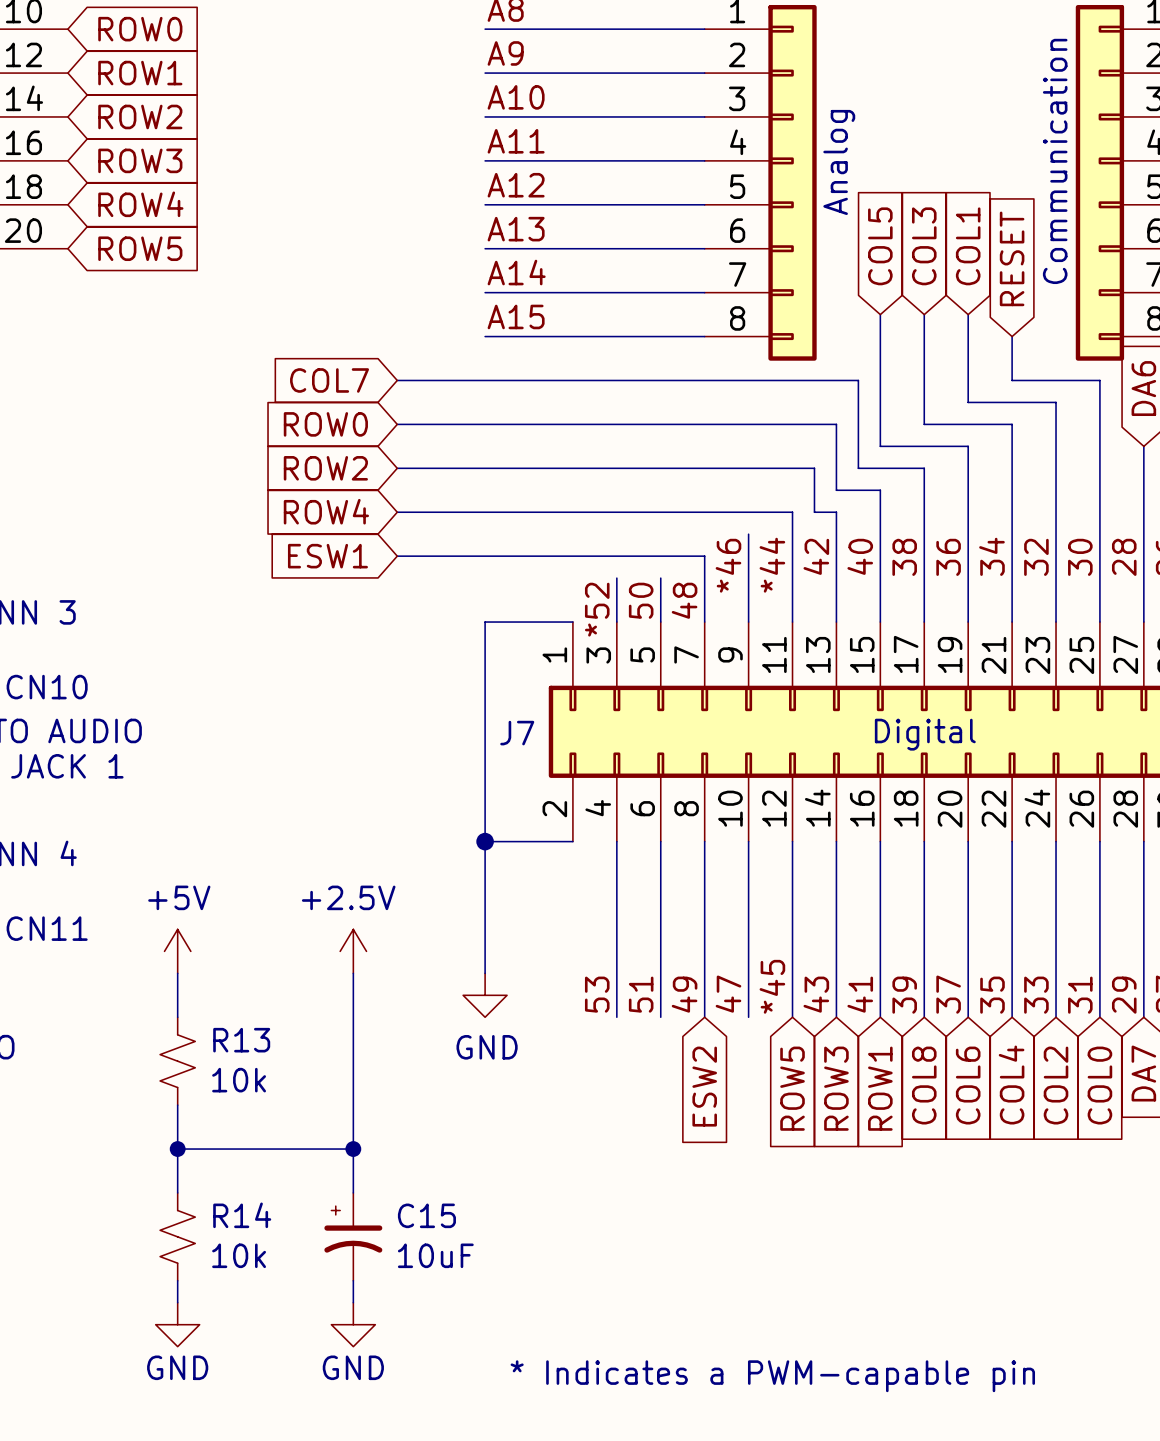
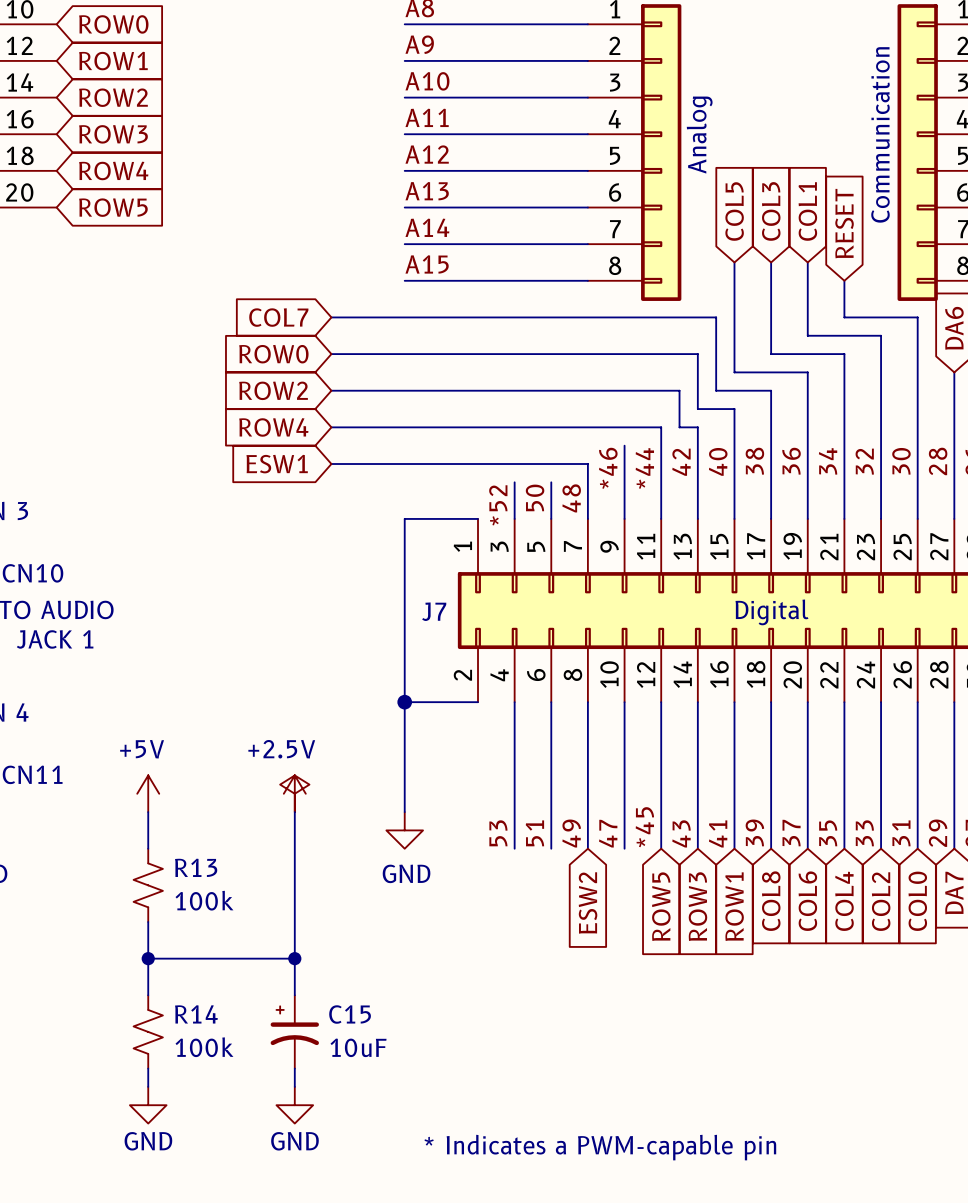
power symbol: none -> (294, 793)
R13 value: 10k (239, 1080) -> 100k (204, 900)
R14 value: 10k (239, 1255) -> 100k (204, 1047)

